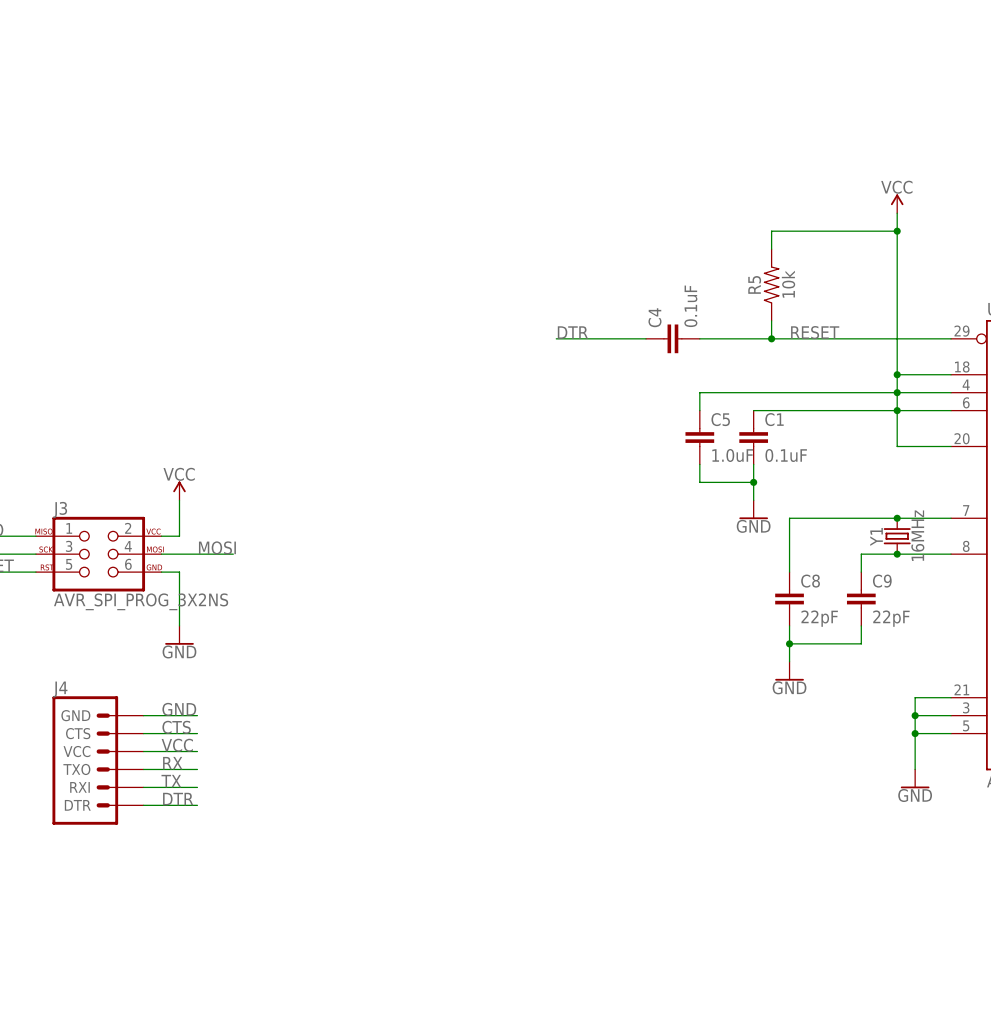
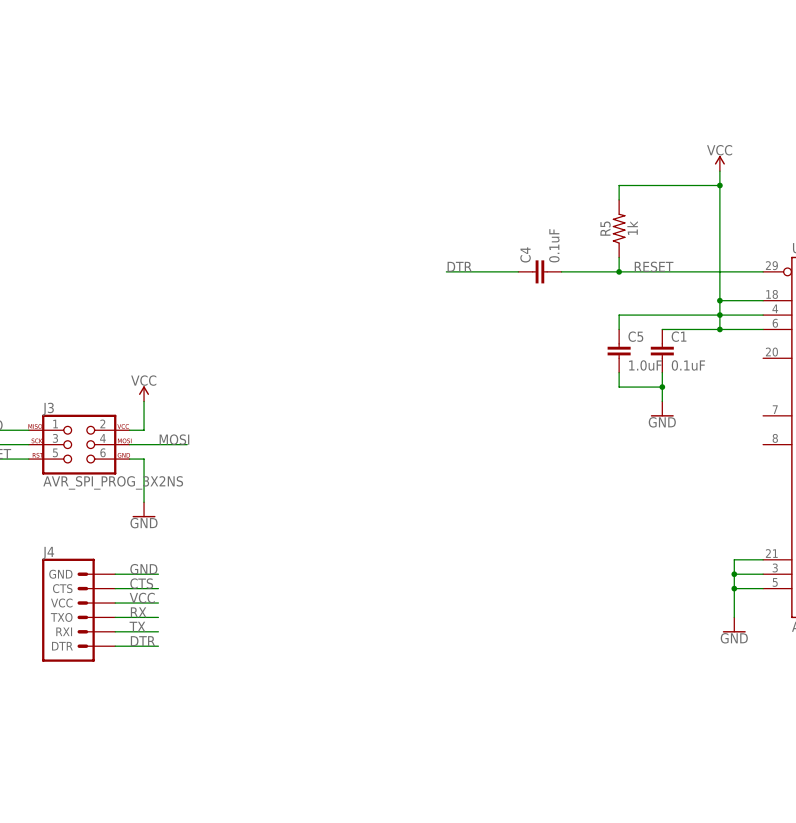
R5 value: 10k (788, 284) -> 1k (632, 228)
wire: (771, 392) (699, 392) (699, 410) -> (619, 315) (619, 329)
wire: (753, 410) (825, 410) -> none
wire: (897, 410) (897, 446) (951, 446) -> none
C5 position: (699, 437) -> (619, 351)
C1 position: (753, 437) -> (662, 351)
wire: (699, 464) (699, 482) (753, 482) -> (619, 372) (619, 387) (662, 387)
wire: (753, 464) (753, 500) -> (662, 372) (662, 401)
junction: (753, 482) -> none
junction: none -> (662, 387)
power symbol position: GND (753, 509) -> GND (662, 409)
junction: (897, 518) -> none
wire: (951, 518) (789, 518) (789, 572) -> none
Y1: 16MHz (897, 536) -> none
junction: (897, 554) -> none
wire: (951, 554) (861, 554) (861, 572) -> none
C8: 22pF (789, 599) -> none
C9: 22pF (861, 599) -> none
wire: (789, 625) (789, 661) -> none
wire: (861, 625) (861, 643) (789, 643) -> none
junction: (789, 643) -> none
power symbol: GND (789, 671) -> none

